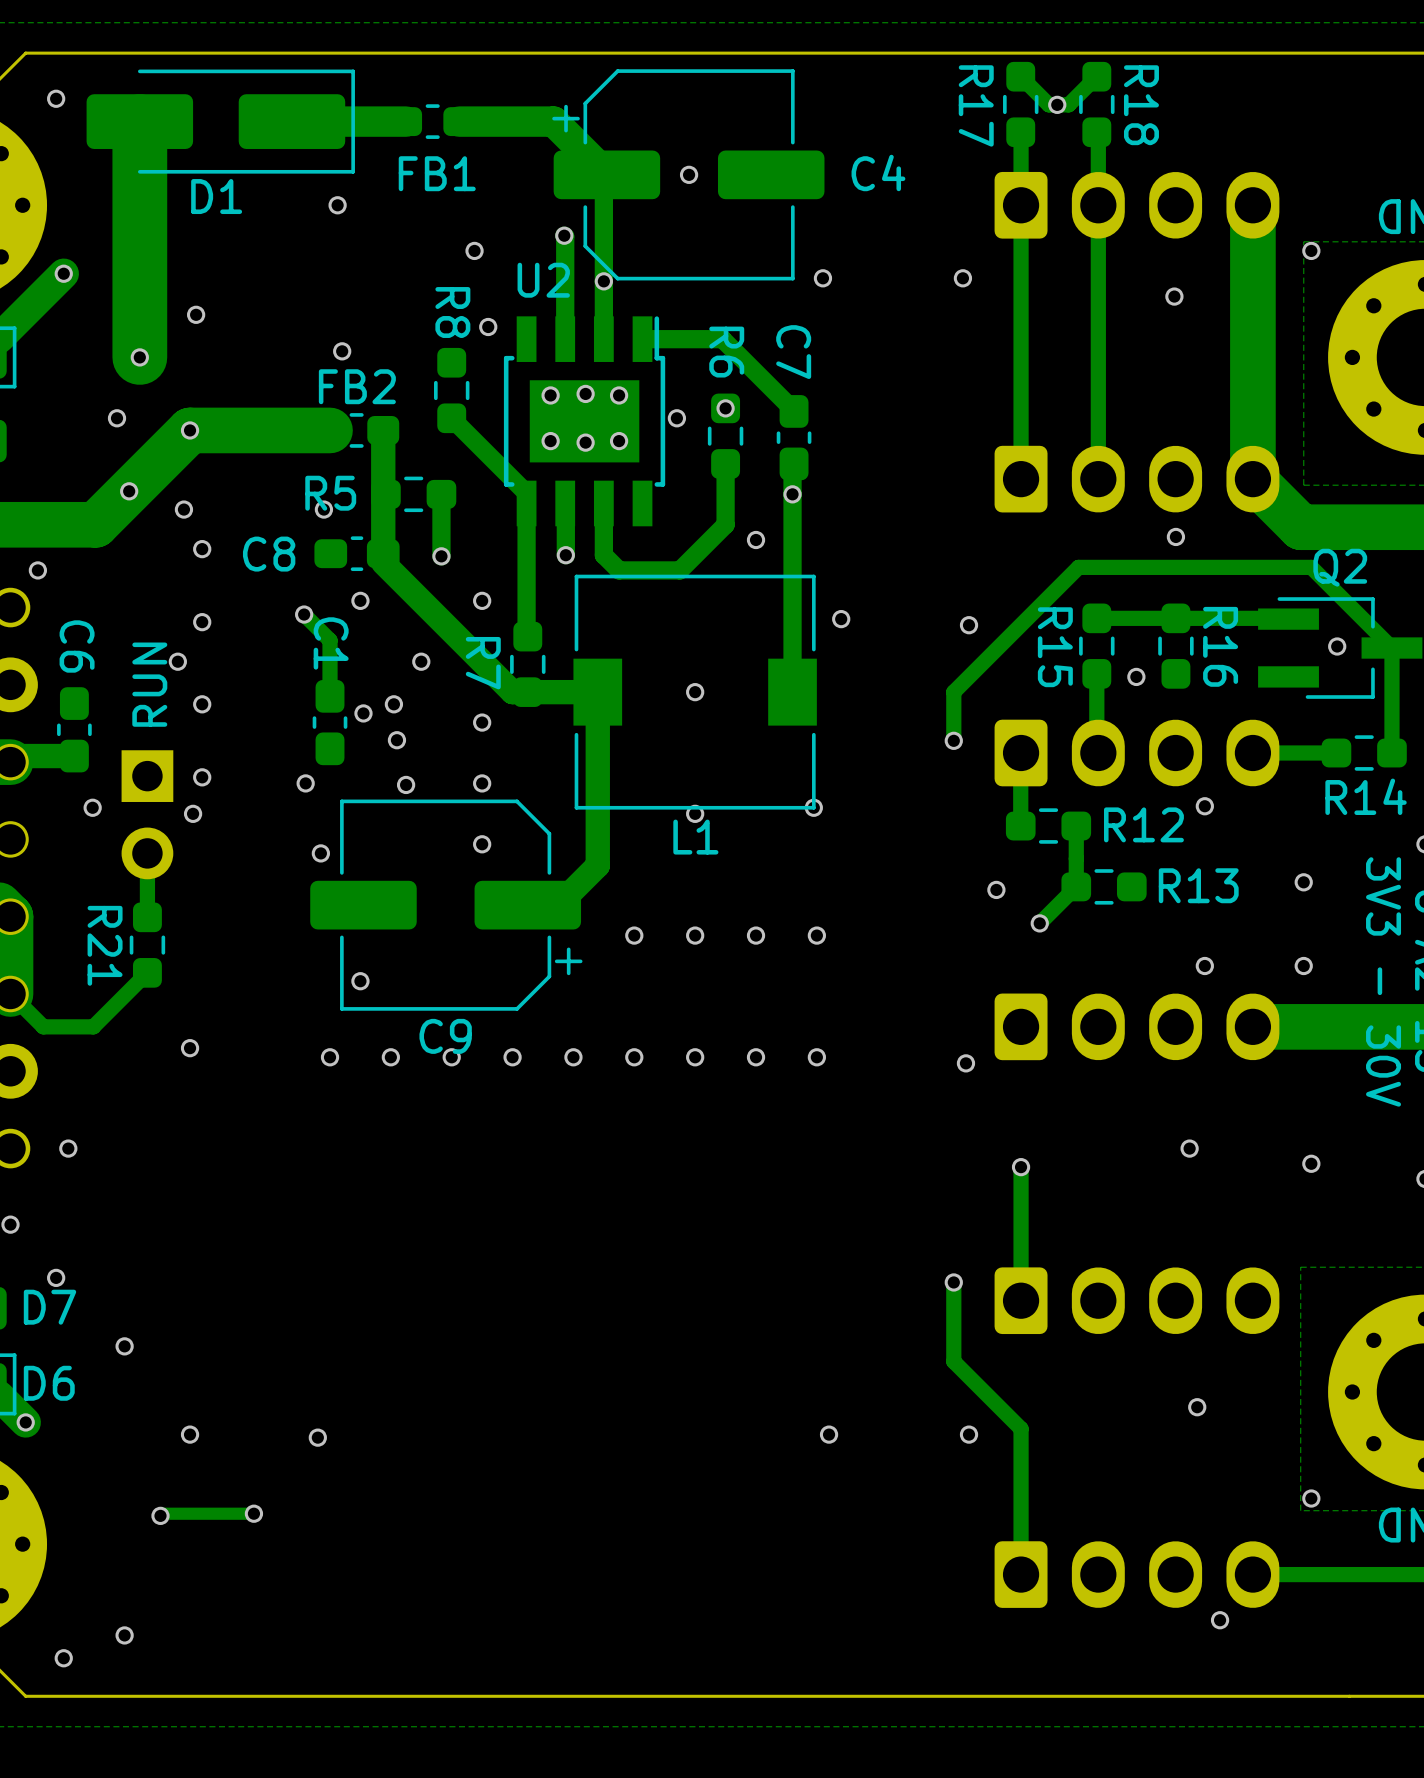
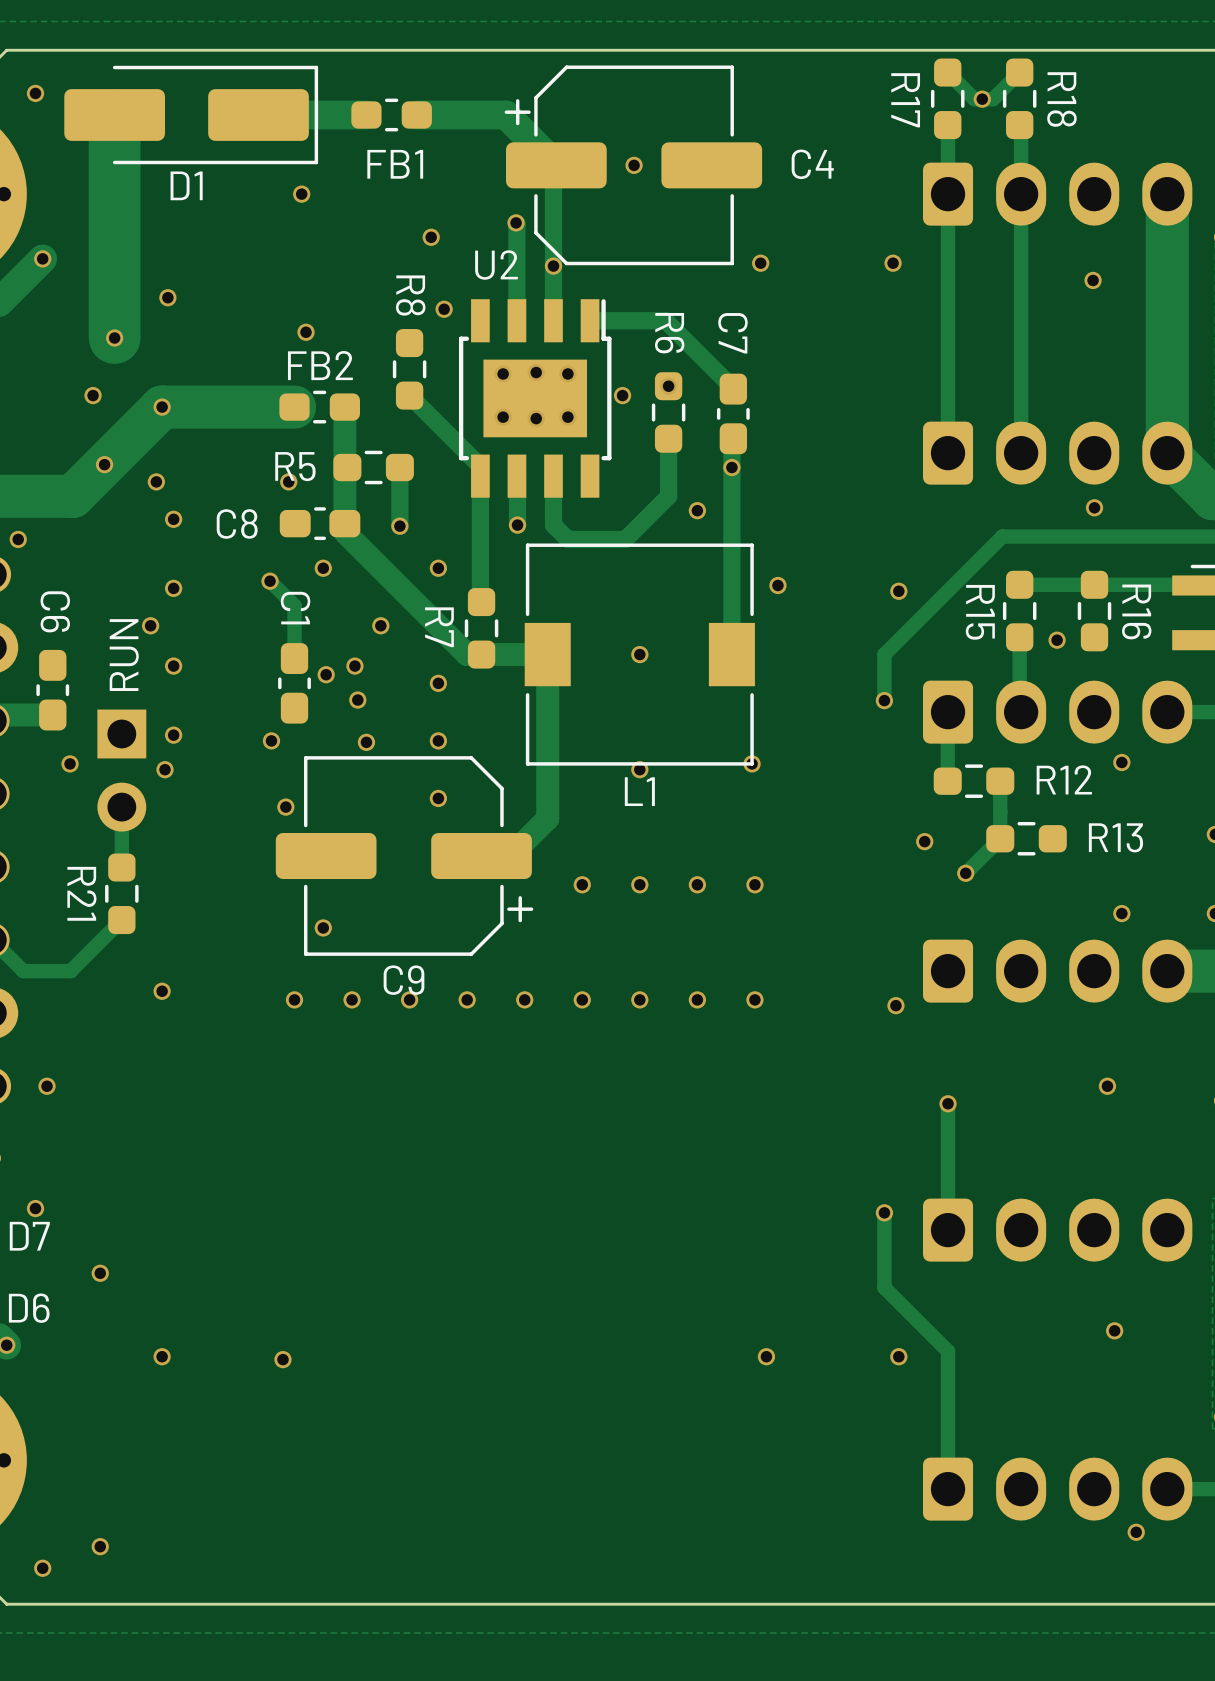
track: (253, 1513) (162, 1513) (160, 1515) -> none
via: (253, 1513) -> none
via: (160, 1515) -> none

